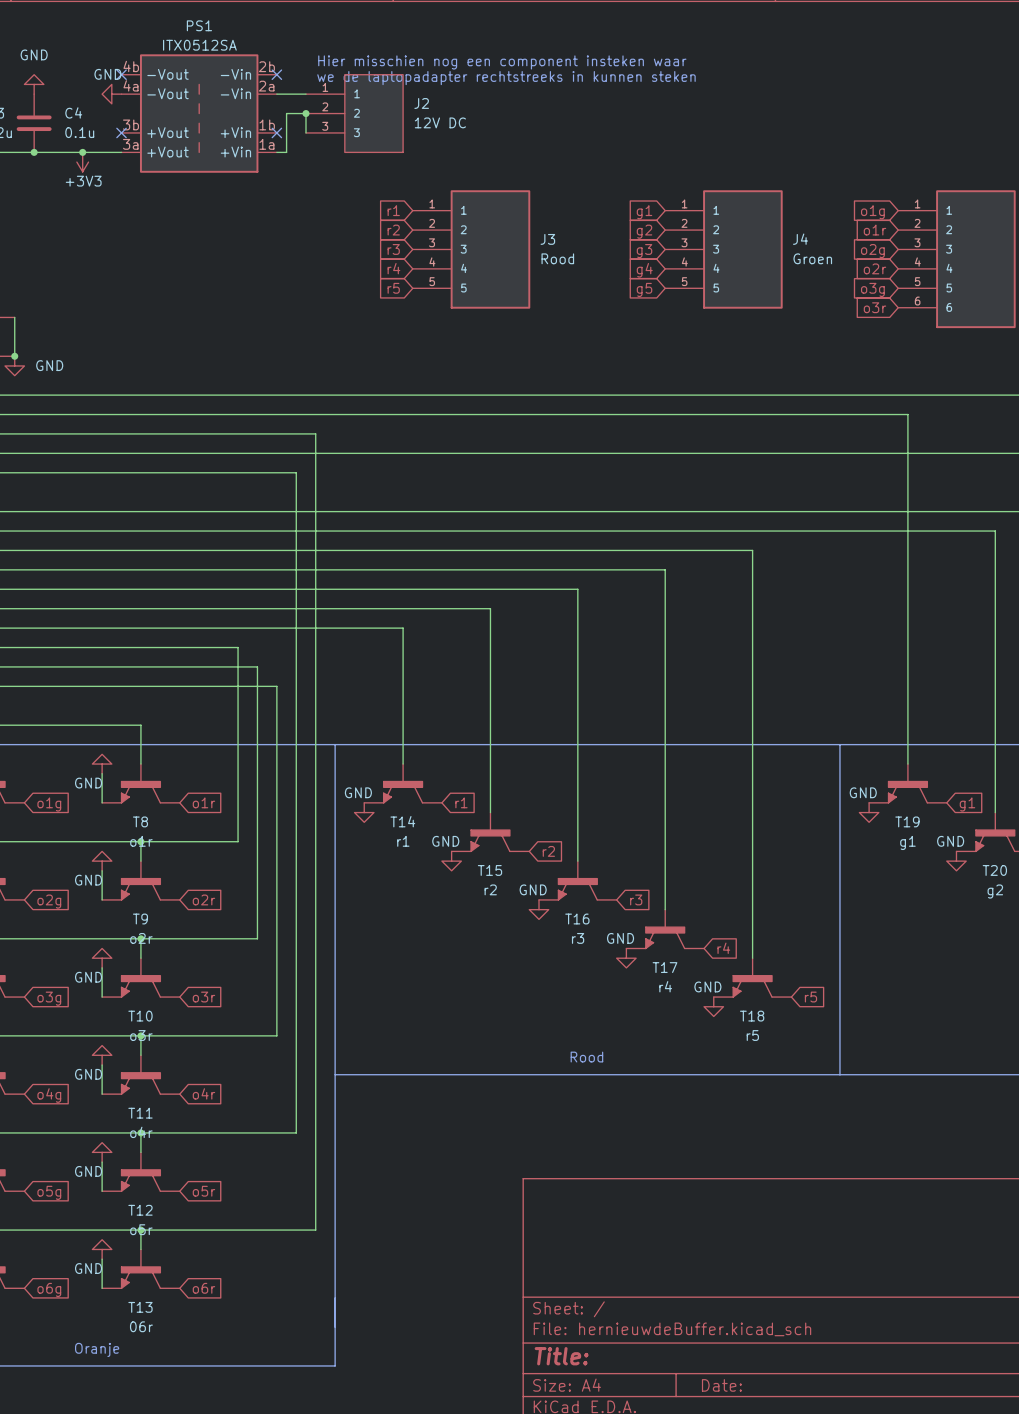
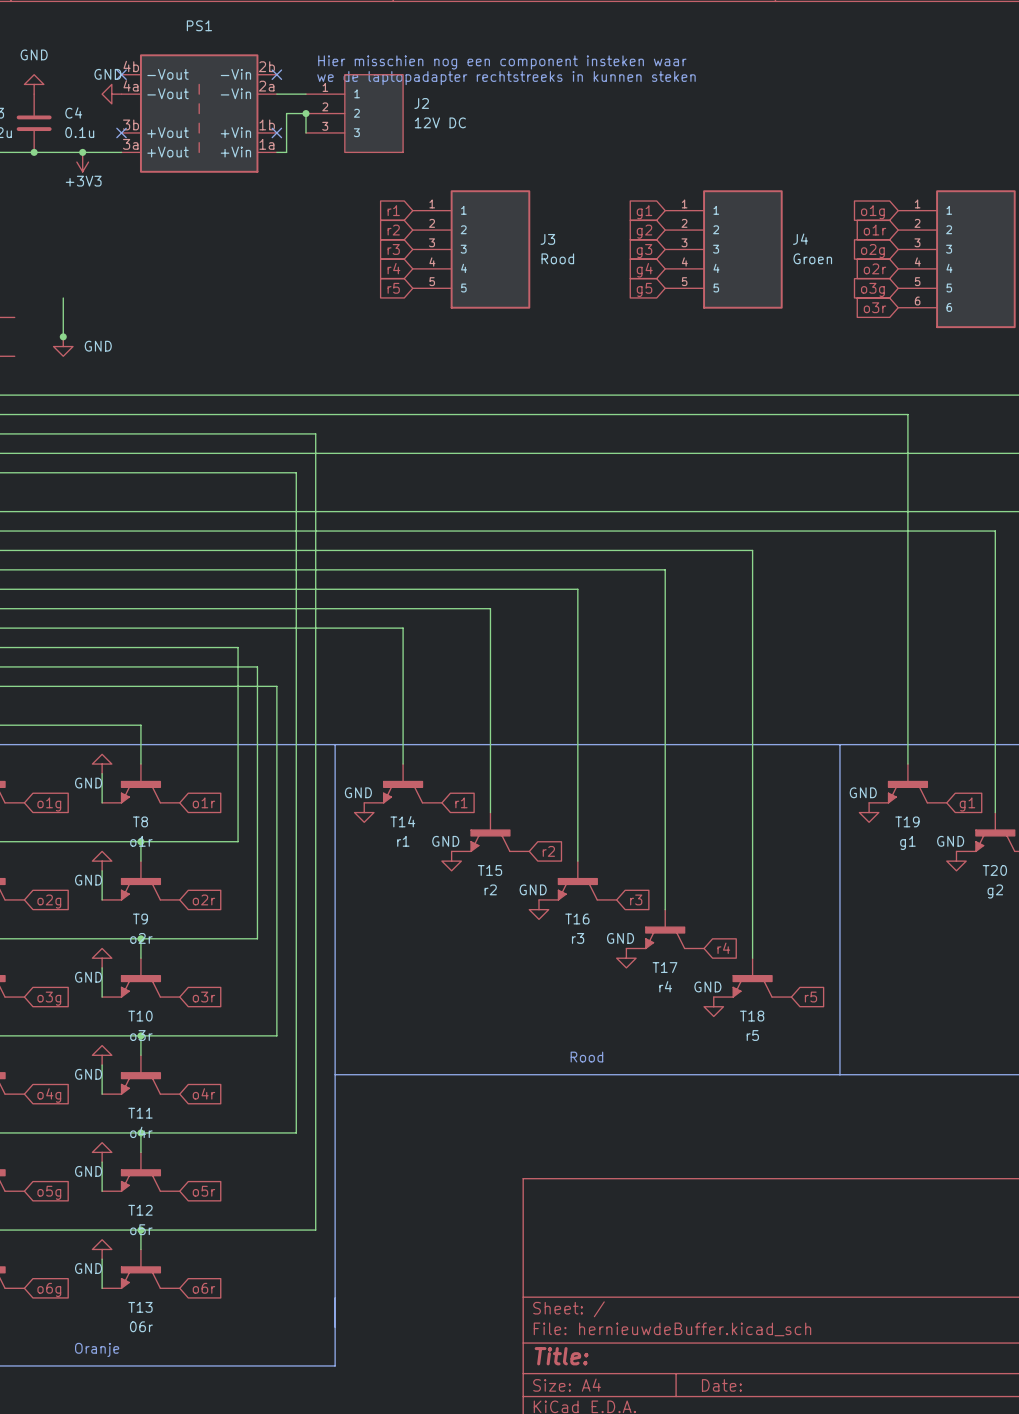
PS1 value: ITX0512SA (199, 45) -> none
wire: (14, 317) (14, 356) -> (63, 298) (63, 336)
junction: none -> (63, 336)
junction: (14, 356) -> none
power symbol position: GND (14, 365) -> GND (63, 346)

